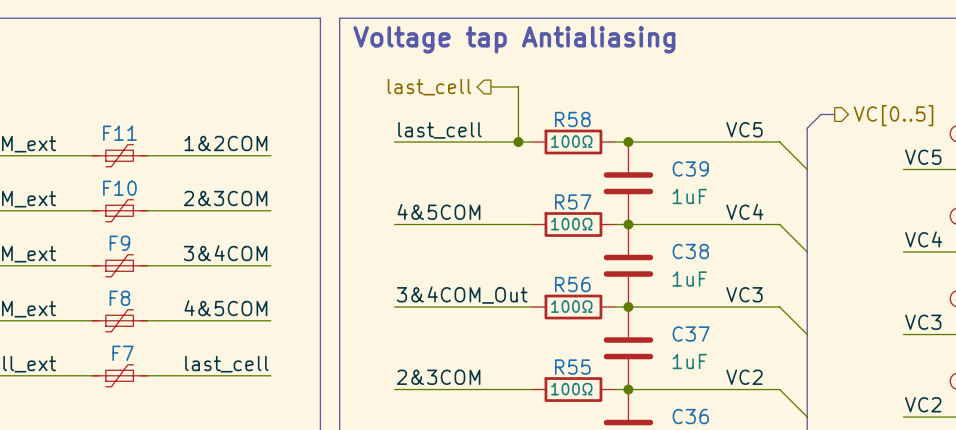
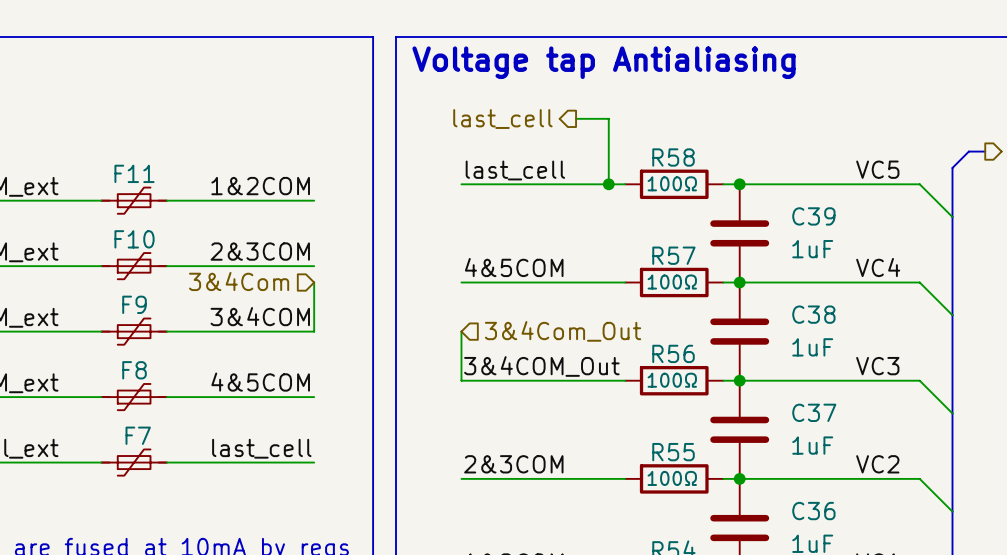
hierarchical label: none -> 3&4Com (239, 281)
wire: none -> (314, 282) (314, 331)
wire: none -> (461, 331) (461, 380)
hierarchical label: none -> 3&4Com_Out (563, 331)

